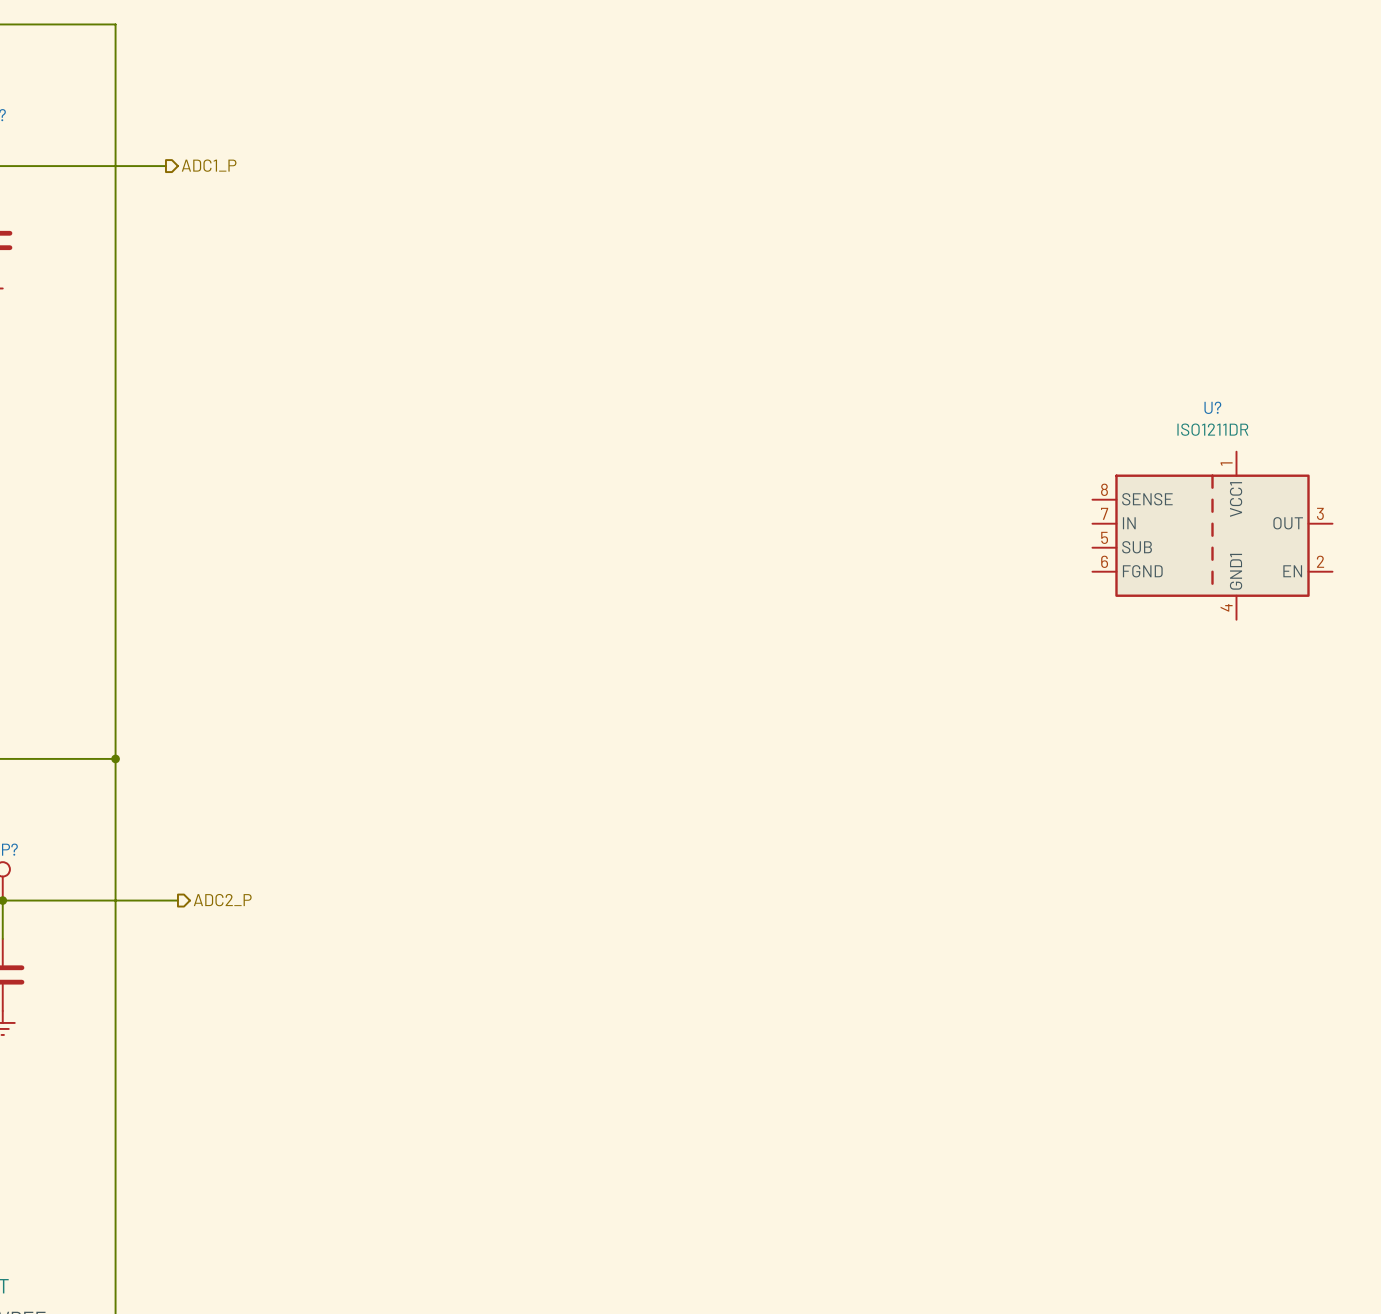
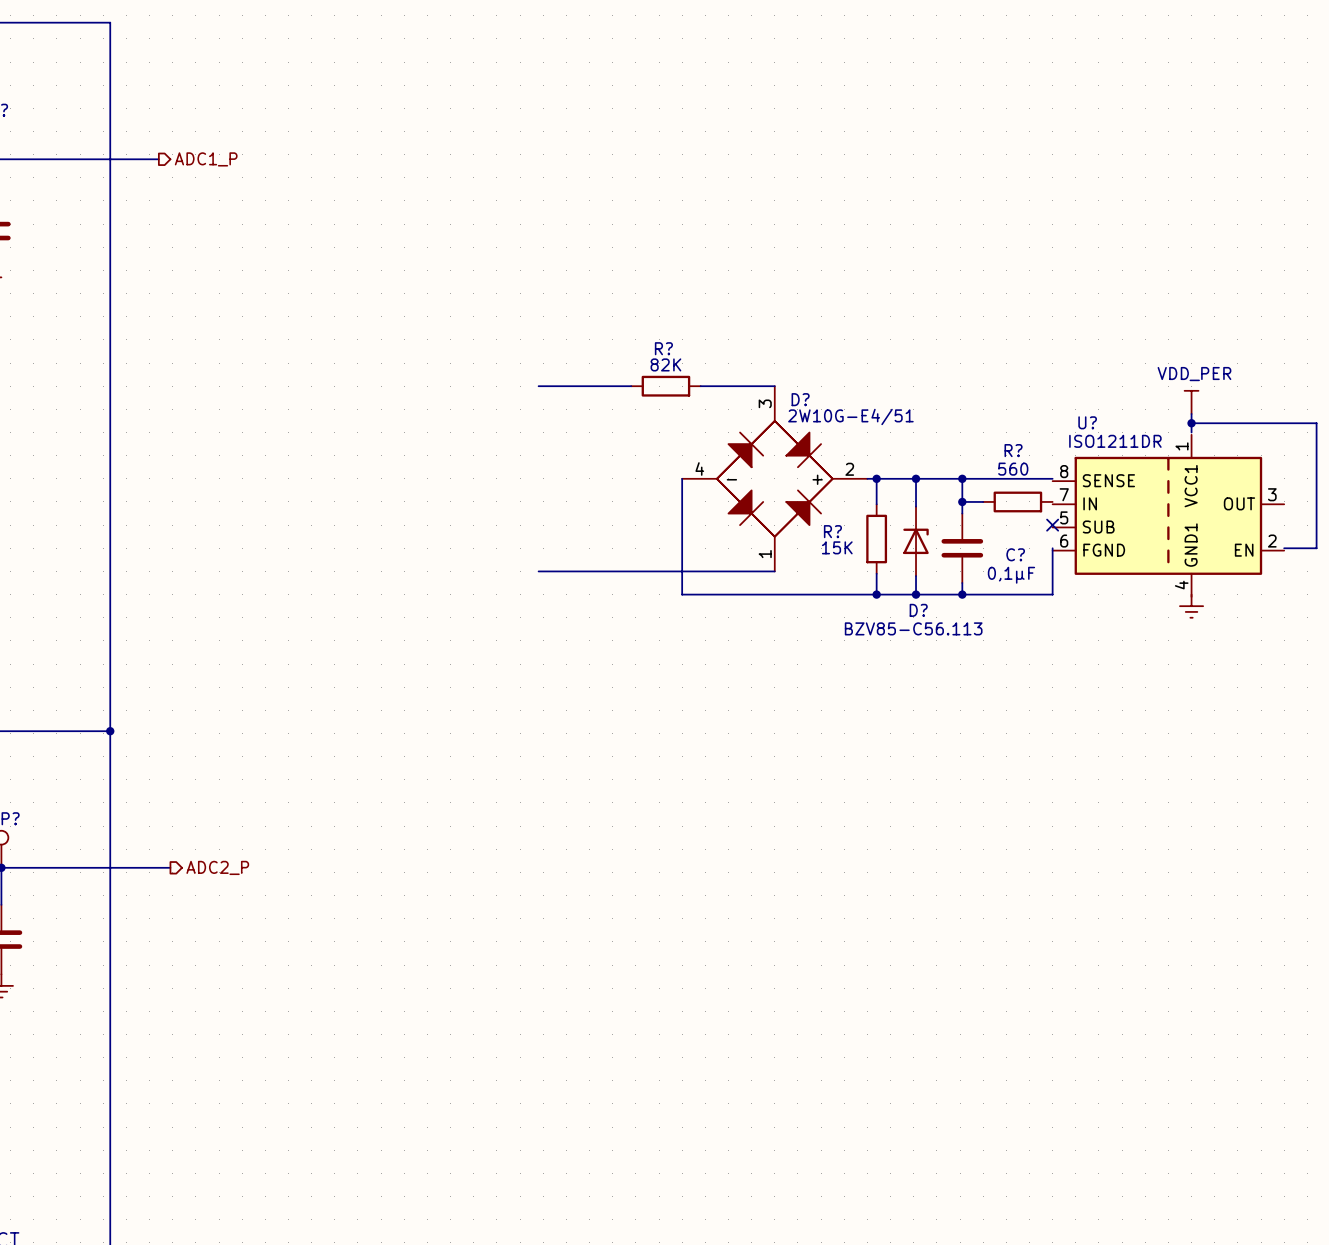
wire: none -> (538, 386) (631, 386)
R?: none -> 82K (665, 386)
wire: none -> (700, 386) (774, 386)
U? name position: U? (1212, 407) -> U? (1087, 422)
power symbol: none -> VDD_PER (1191, 402)
U? value position: ISO1211DR (1212, 429) -> ISO1211DR (1115, 441)
wire: none -> (1191, 413) (1191, 432)
wire: none -> (1191, 423) (1316, 423) (1316, 548) (1284, 548)
junction: none -> (1191, 423)
wire: none -> (682, 478) (682, 594) (1052, 594) (1052, 548)
D?: none -> 2W10G-E4/51 (774, 478)
wire: none -> (867, 478) (1052, 478)
wire: none -> (876, 478) (876, 504)
junction: none -> (876, 478)
wire: none -> (916, 478) (916, 506)
junction: none -> (916, 478)
wire: none -> (962, 478) (962, 513)
junction: none -> (962, 478)
wire: none -> (962, 501) (983, 501)
junction: none -> (962, 501)
R?: none -> 560 (1017, 501)
no-connect mark: none -> (1052, 525)
R?: none -> 15K (876, 539)
D?: none -> BZV85-C56.113 (916, 541)
C?: none -> 0,1µF (962, 548)
wire: none -> (538, 571) (774, 571)
wire: none -> (876, 573) (876, 594)
wire: none -> (916, 576) (916, 594)
wire: none -> (962, 583) (962, 594)
junction: none -> (876, 594)
junction: none -> (916, 594)
junction: none -> (962, 594)
power symbol: none -> (1191, 606)

